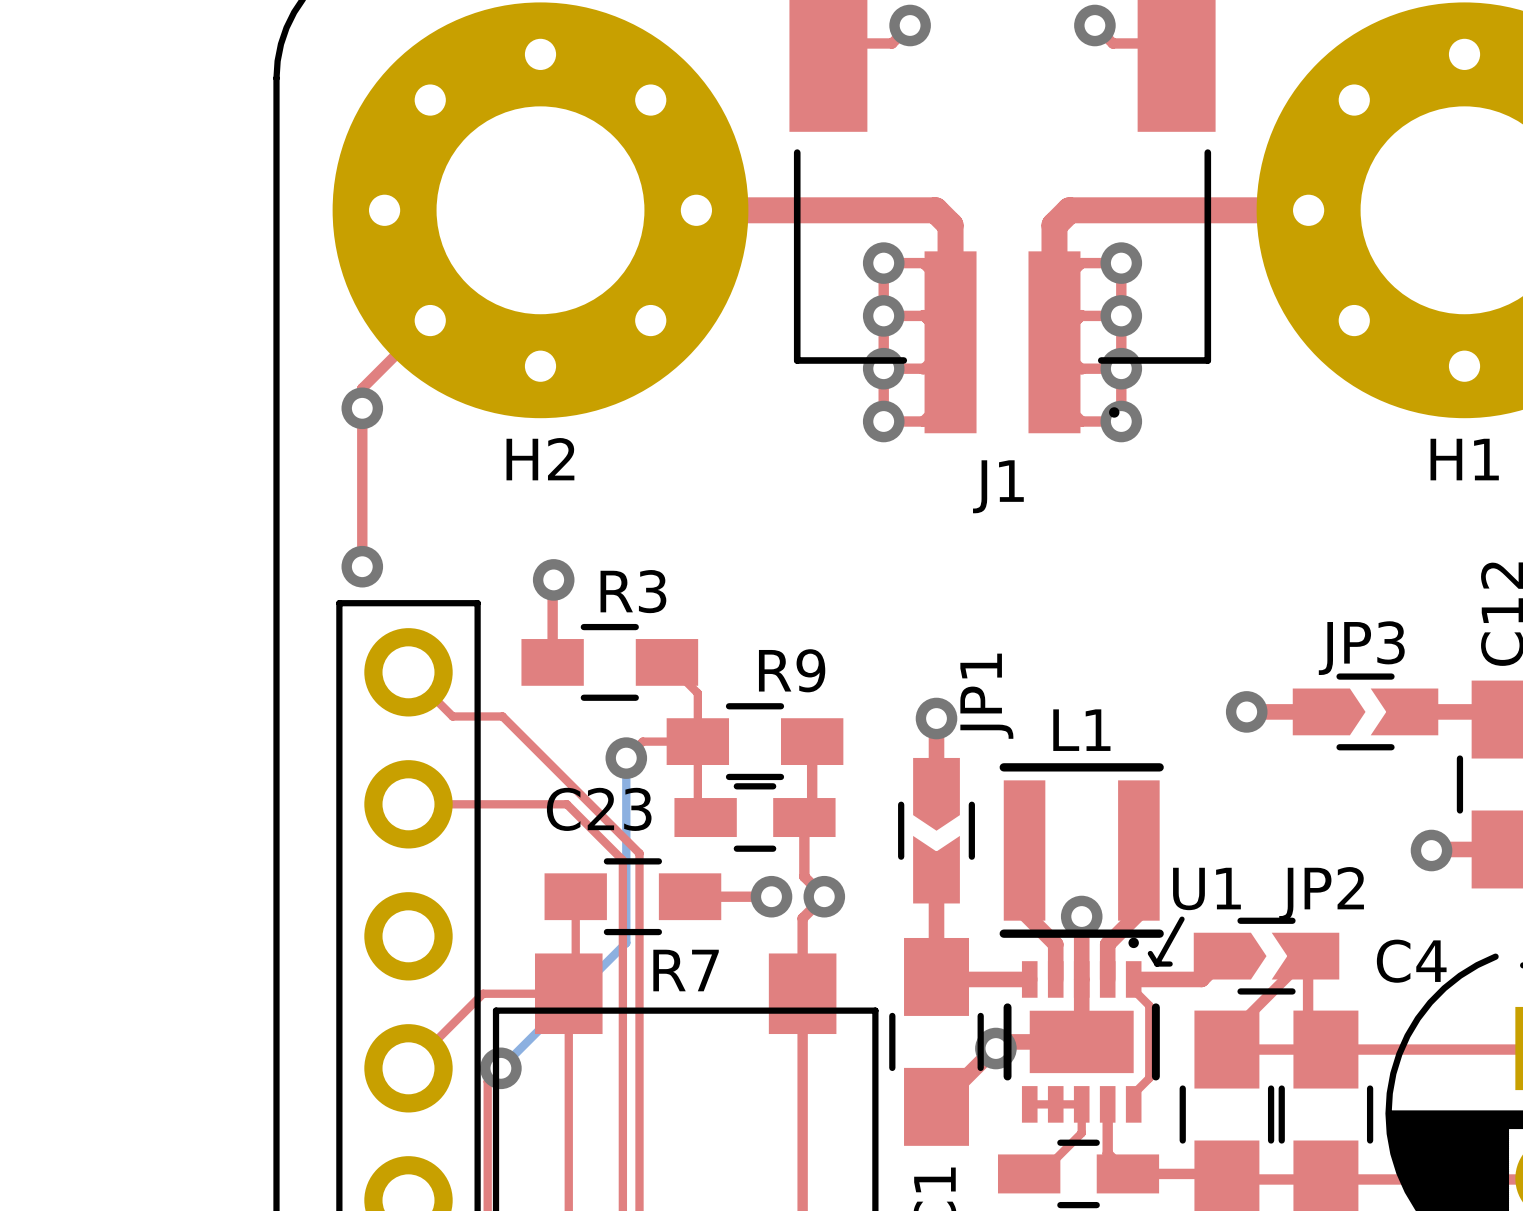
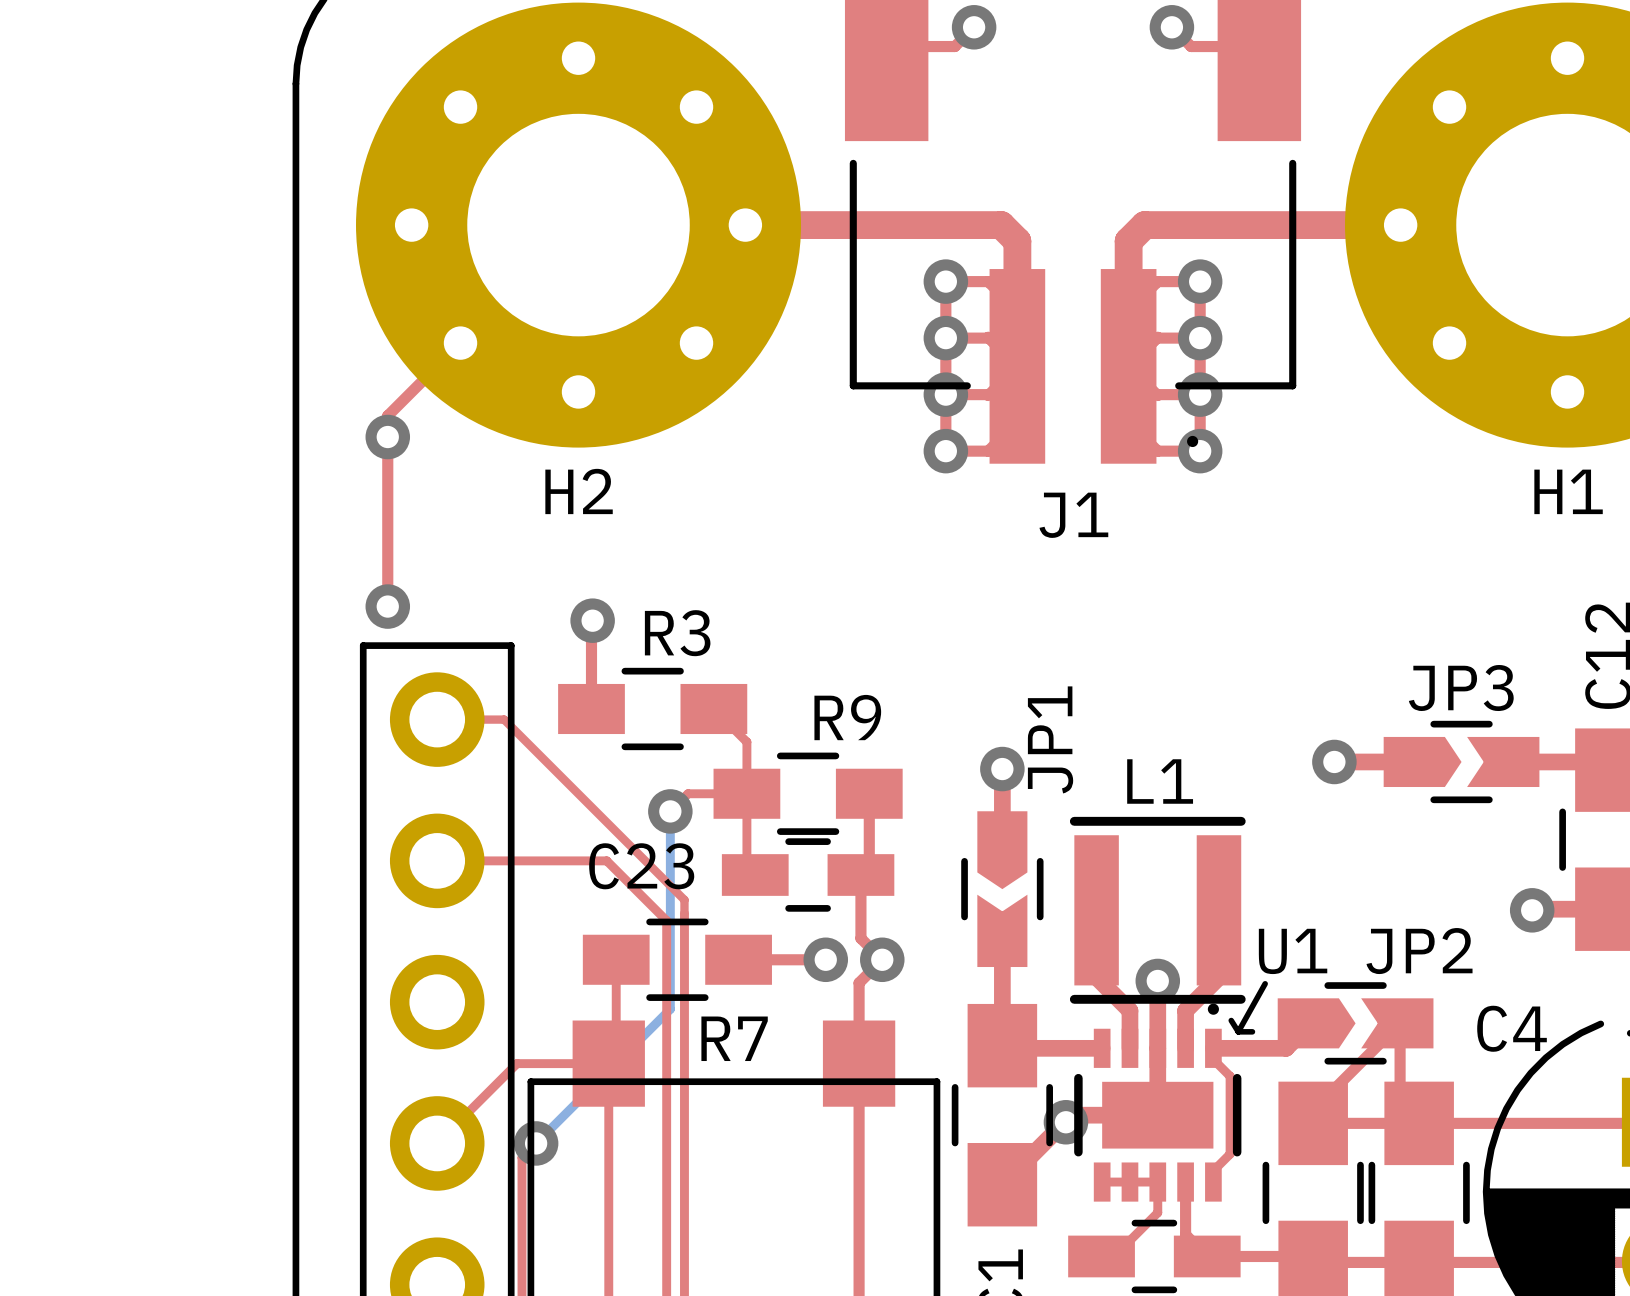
top track: (408, 672) (452, 716) (502, 716) (639, 853) -> (437, 719) (504, 719) (684, 899) (684, 913)

